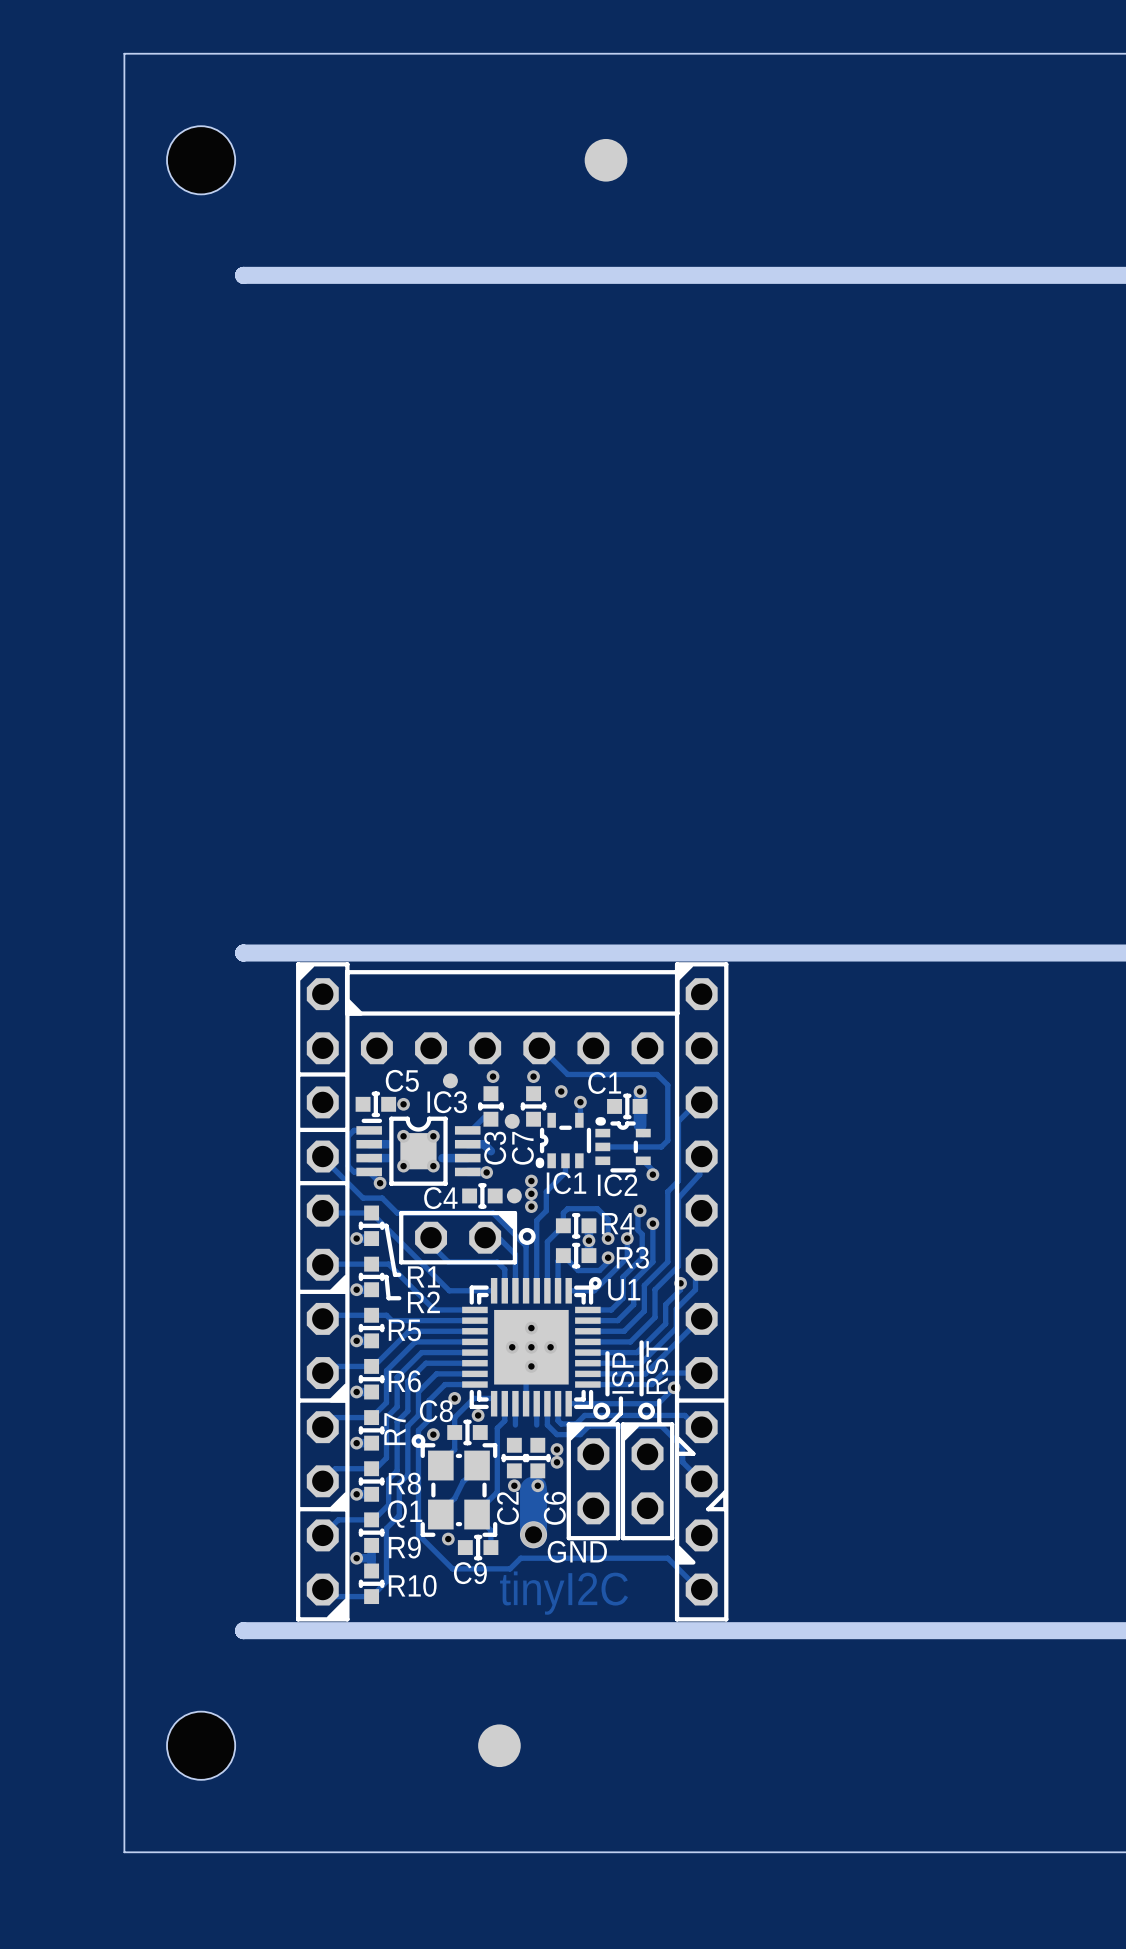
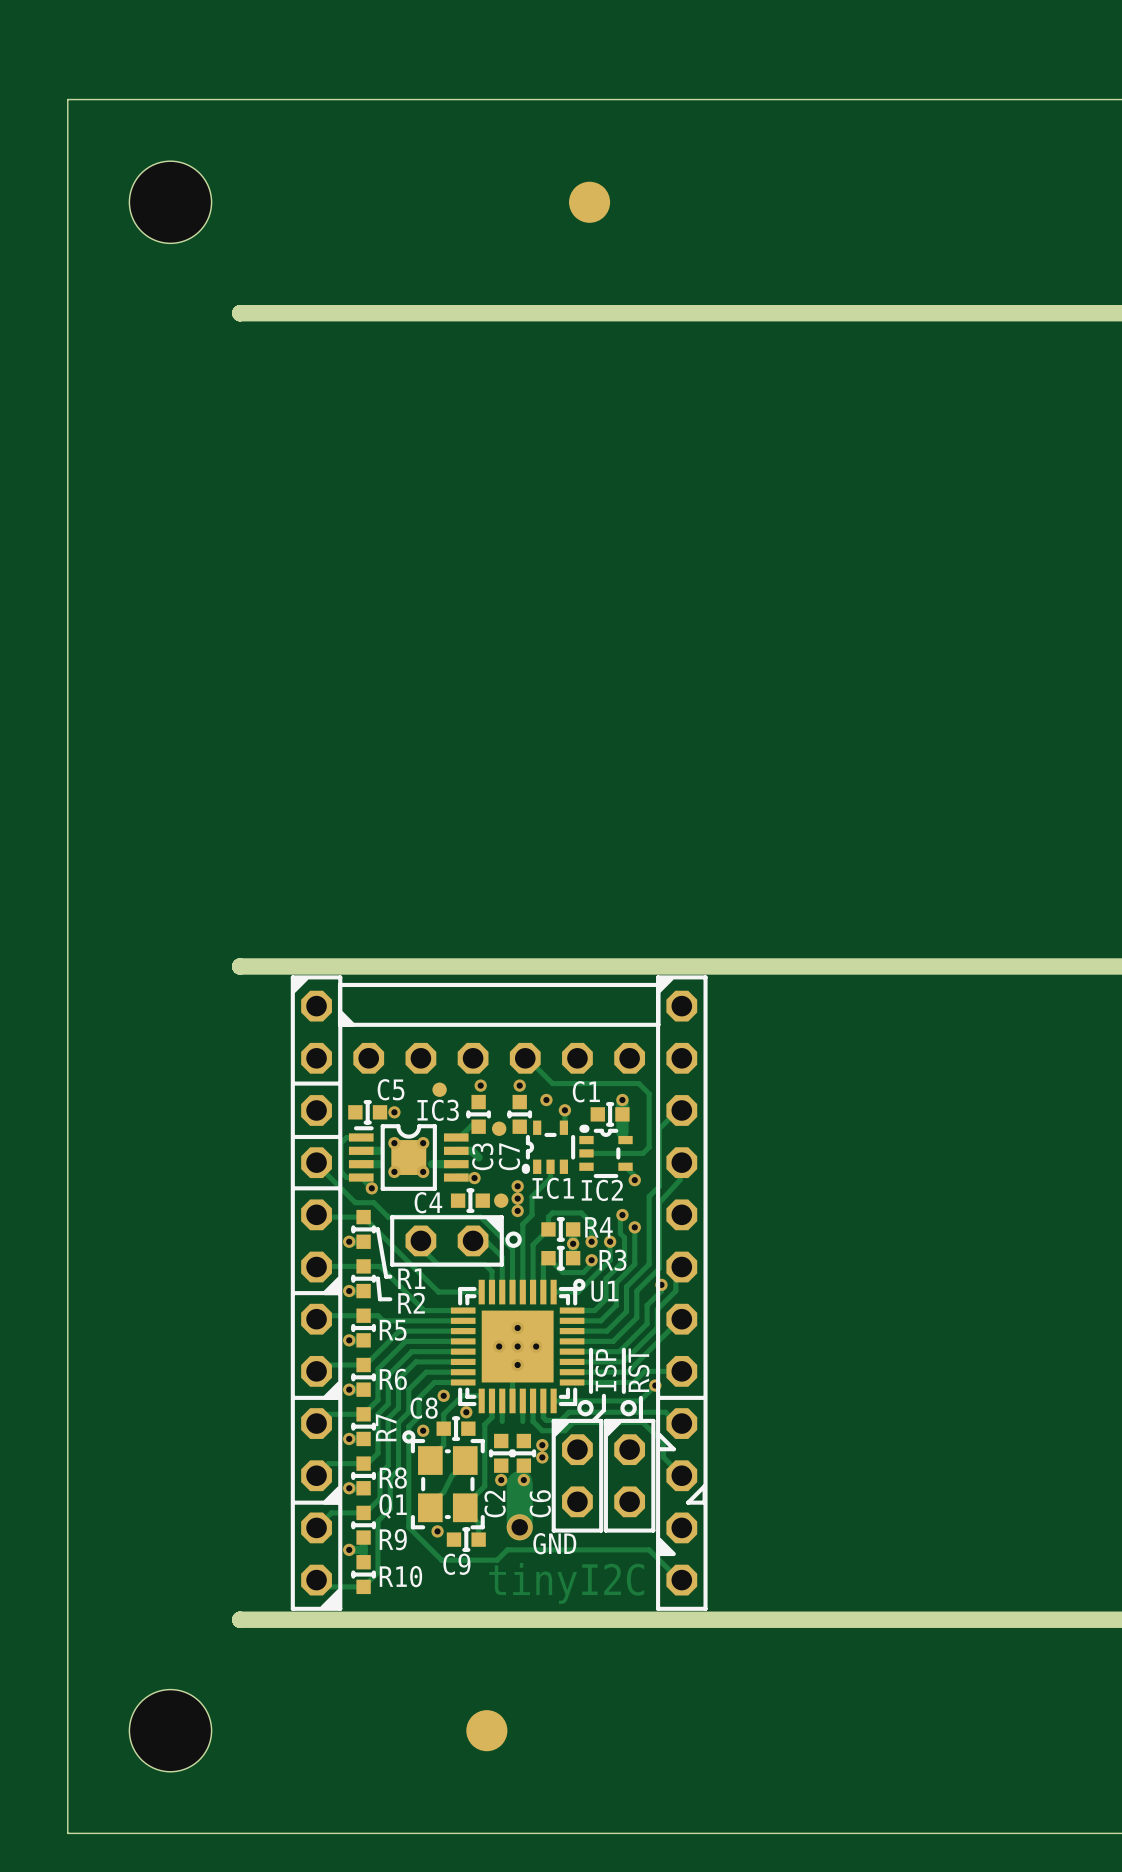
board edge: (124, 53) (124, 1852) -> (125, 99) (67, 99) (67, 1833) (125, 1833)
hole: none -> (170, 202)
hole: (201, 160) -> none
hole: none -> (170, 1730)
hole: (201, 1745) -> none

